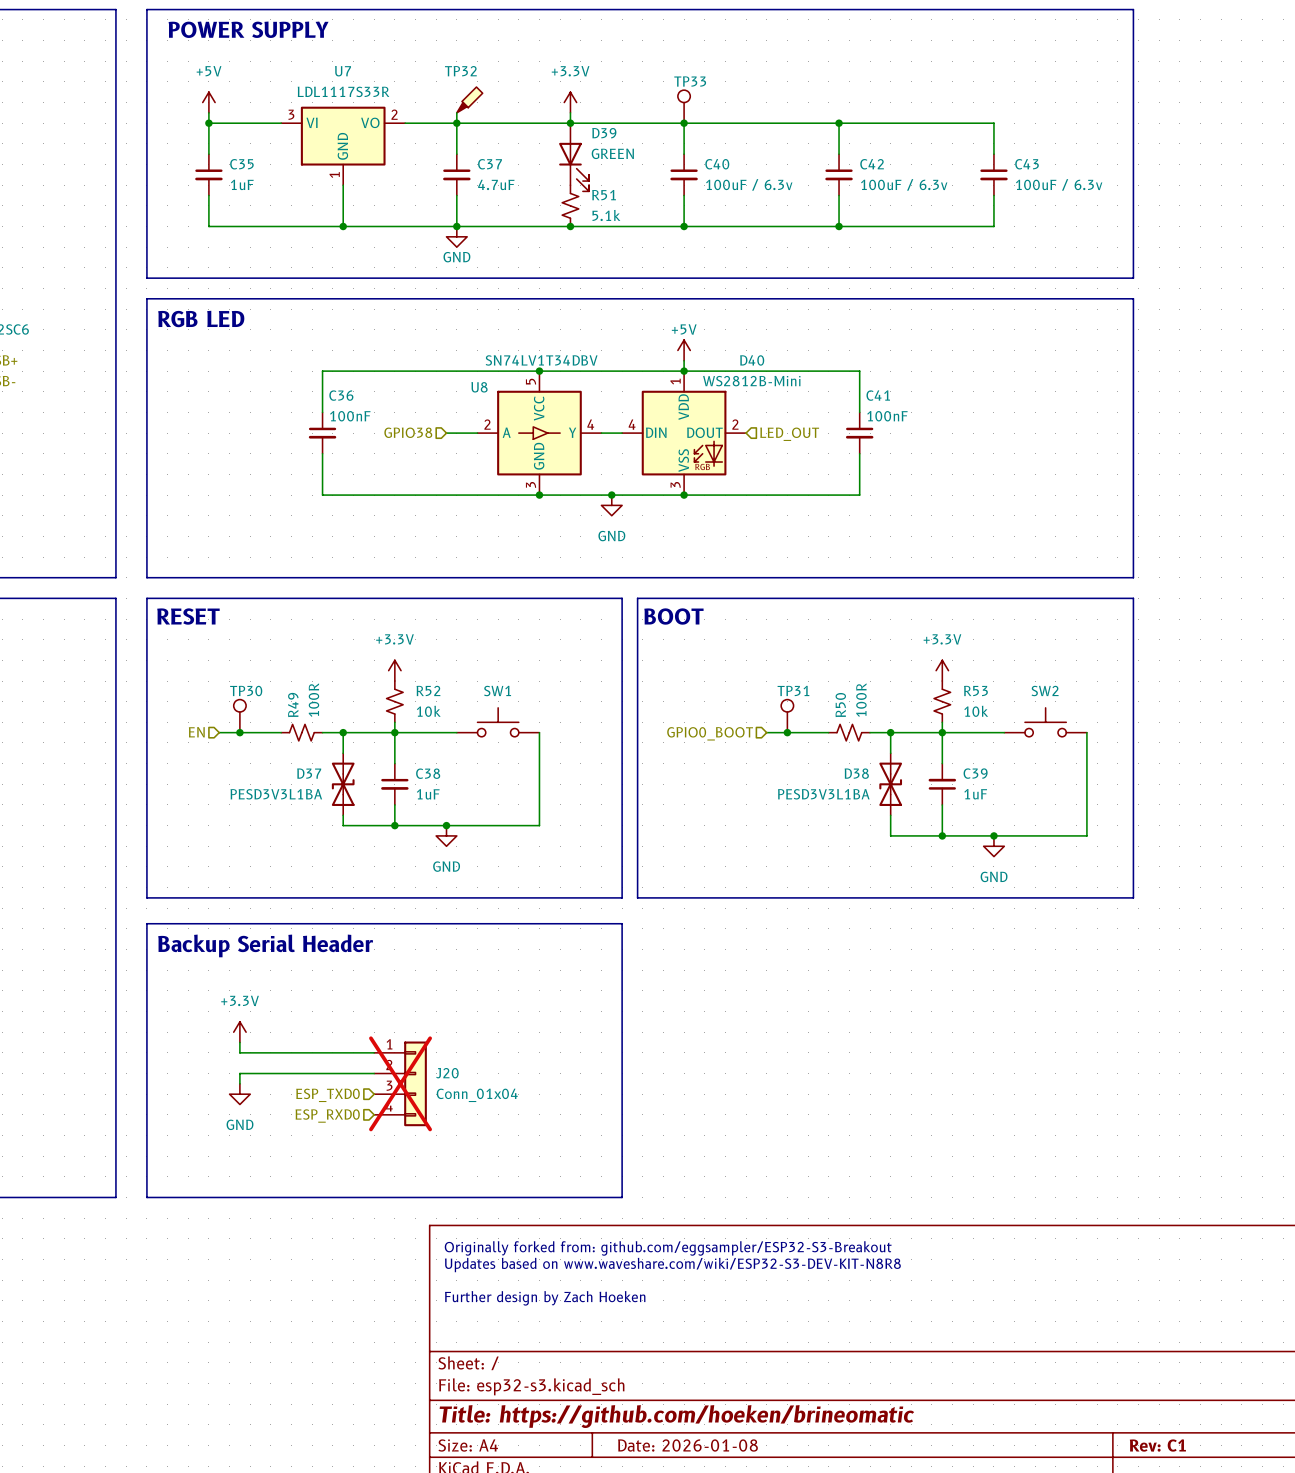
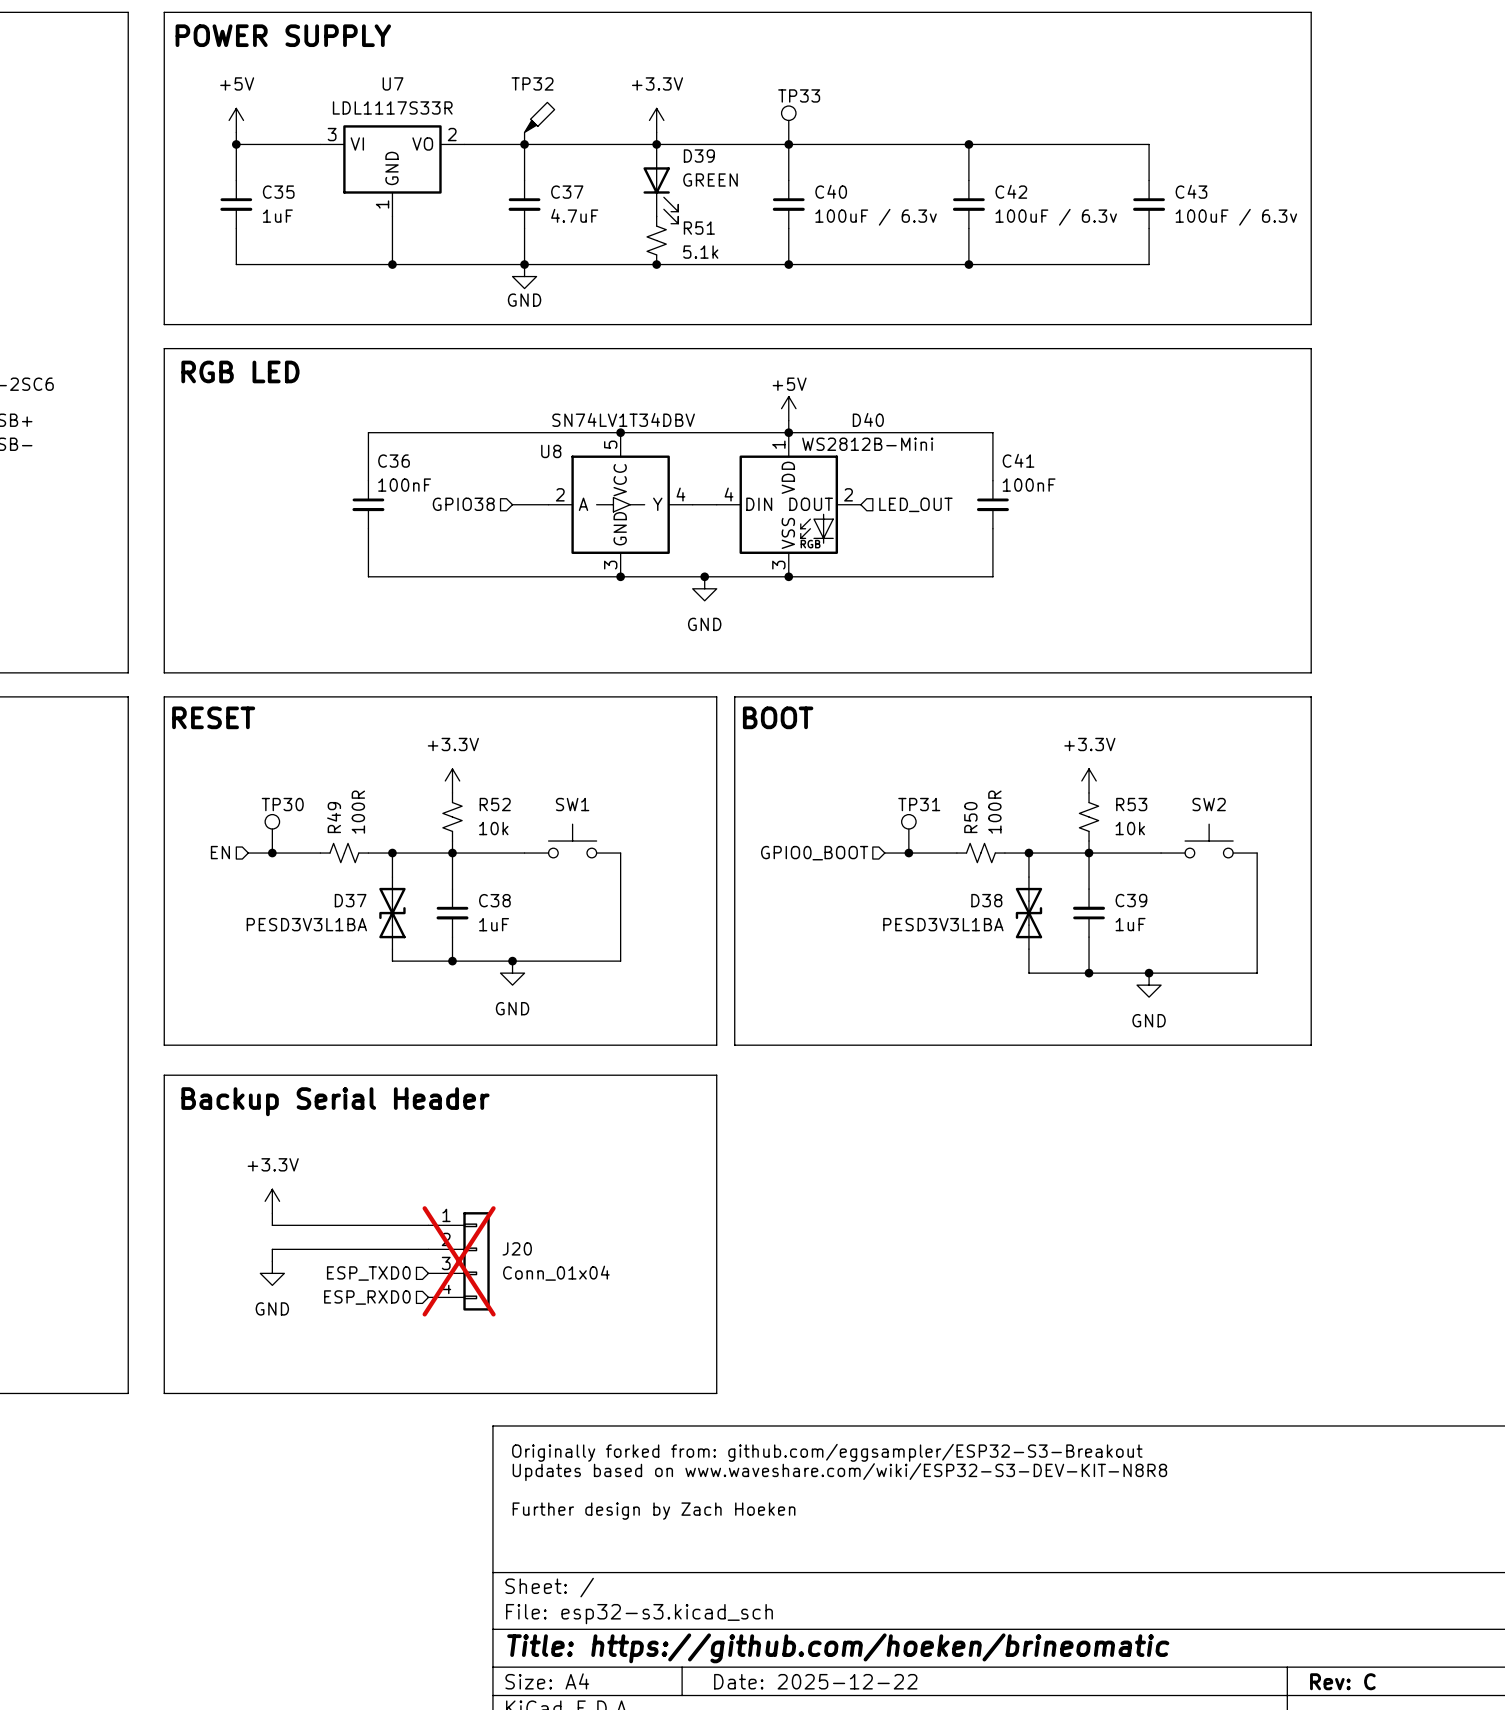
title block: Date: 2026-01-08 (687, 1445) -> Date: 2025-12-22 (815, 1681)
title block: Rev: C1 (1157, 1445) -> Rev: C (1342, 1681)

